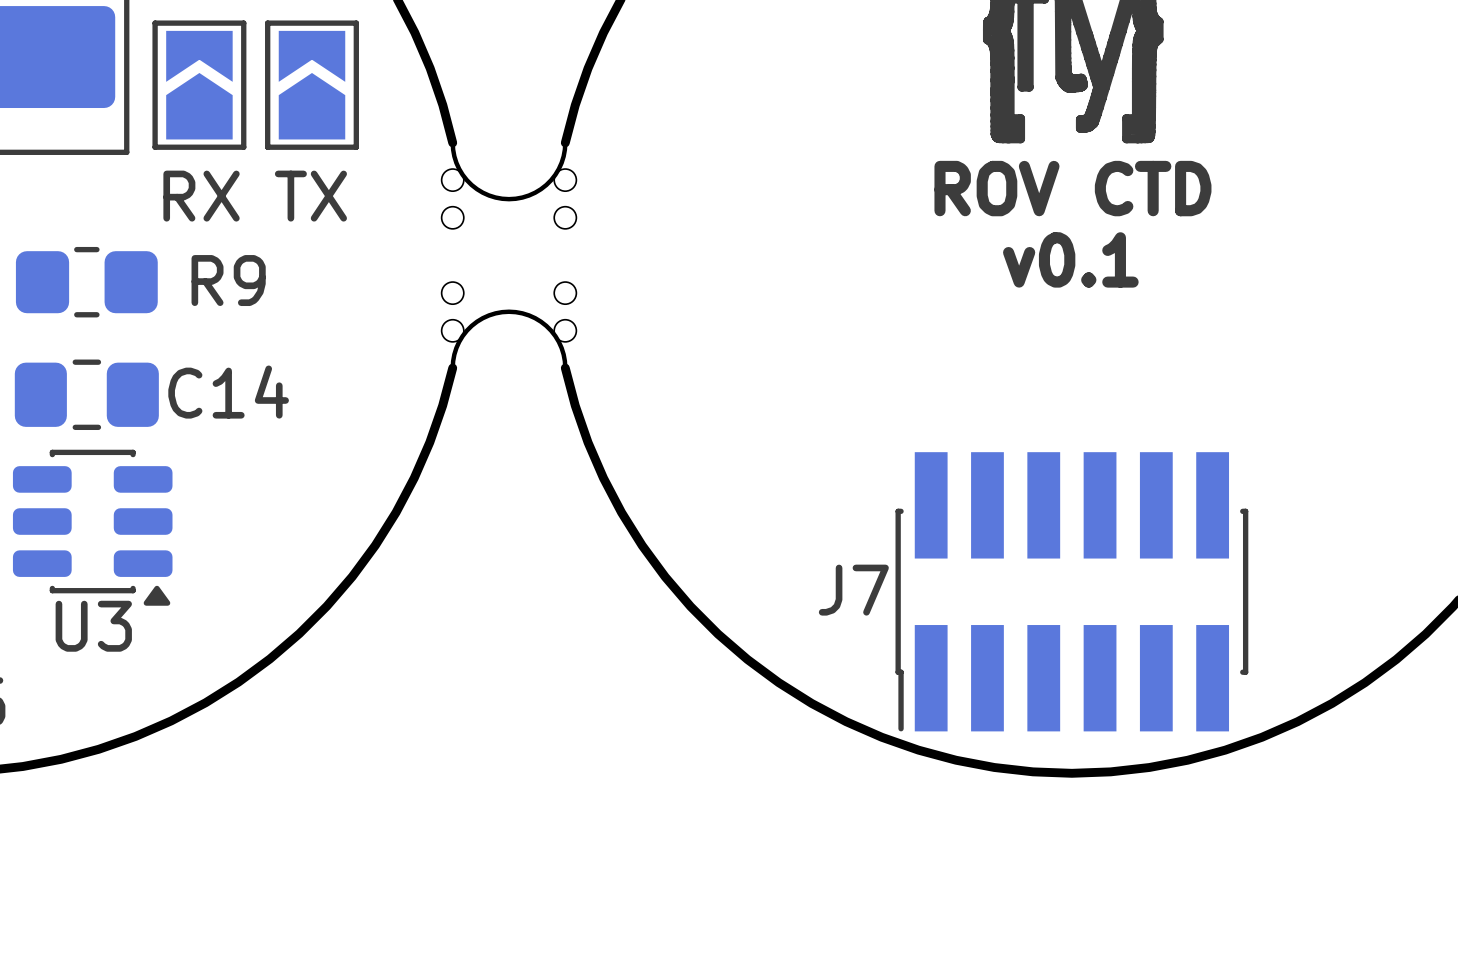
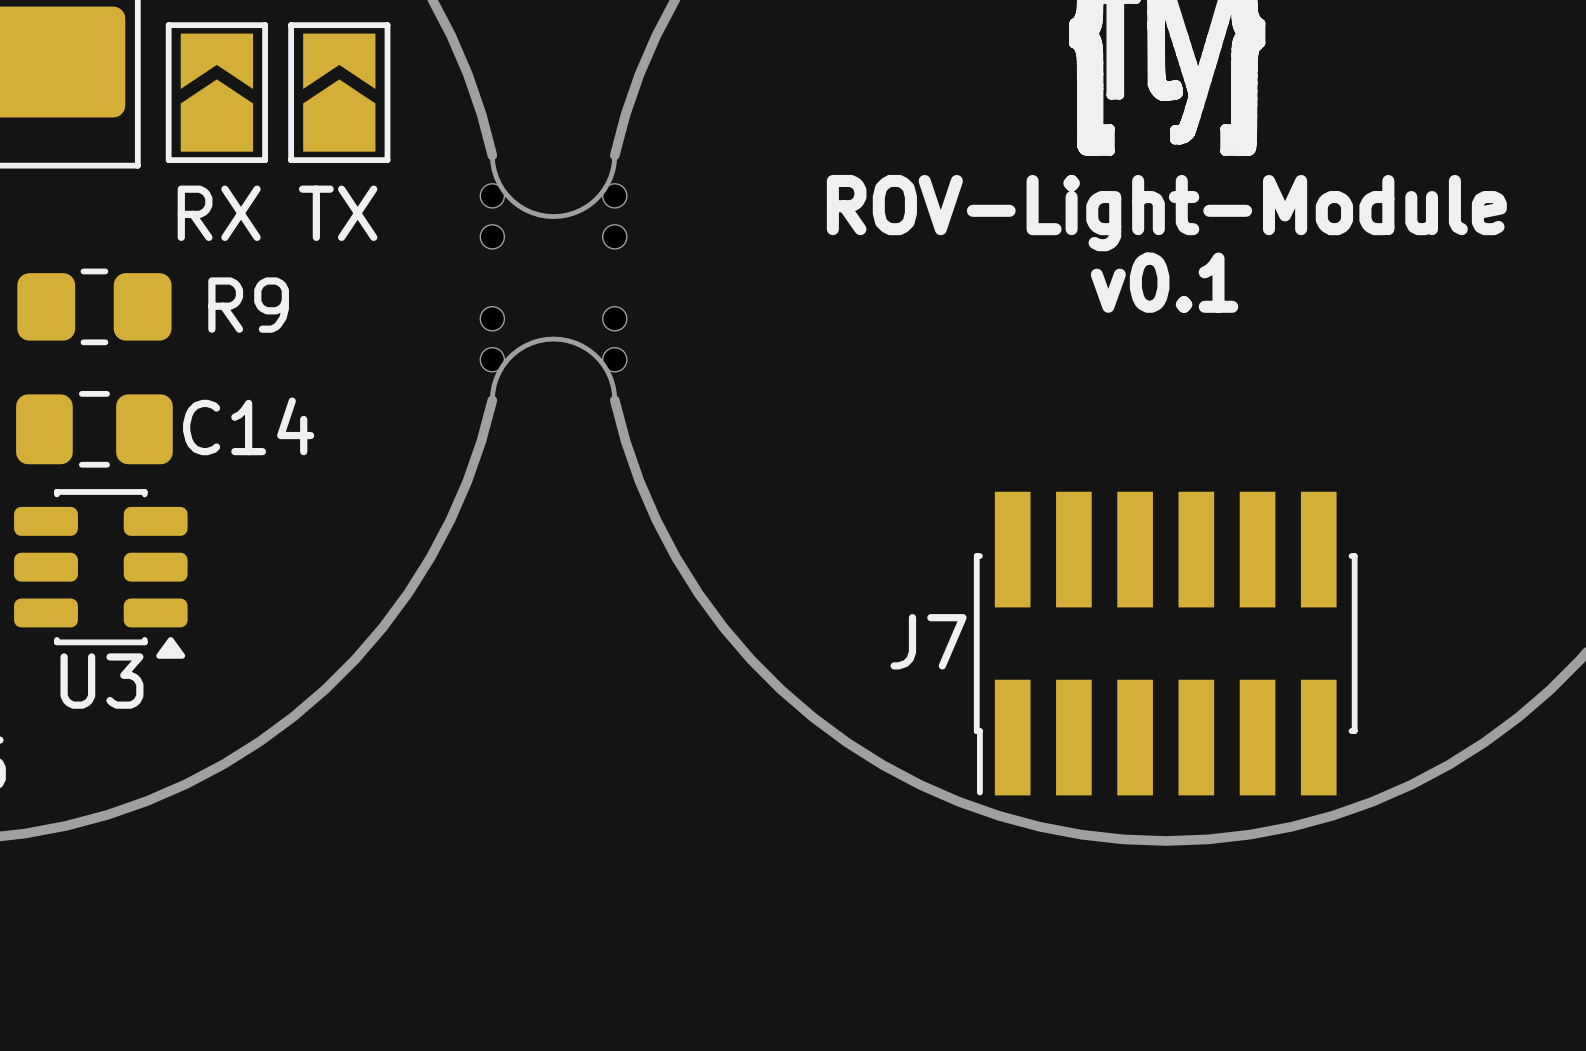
text: ROV CTD (1072, 188) -> ROV-Light-Module (1166, 213)

